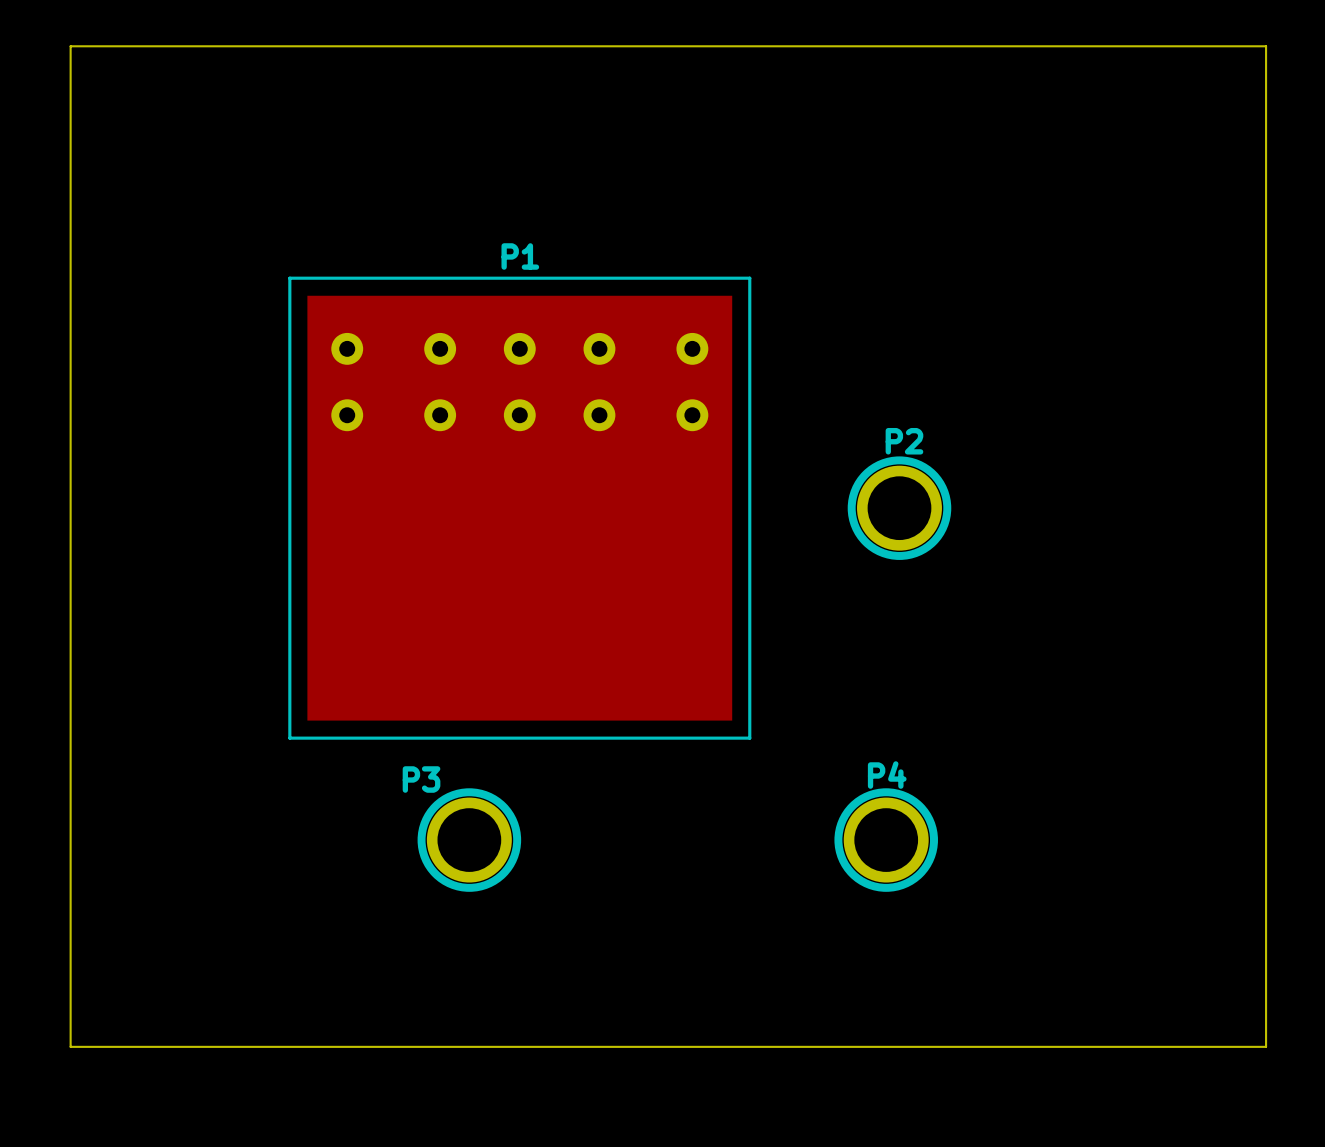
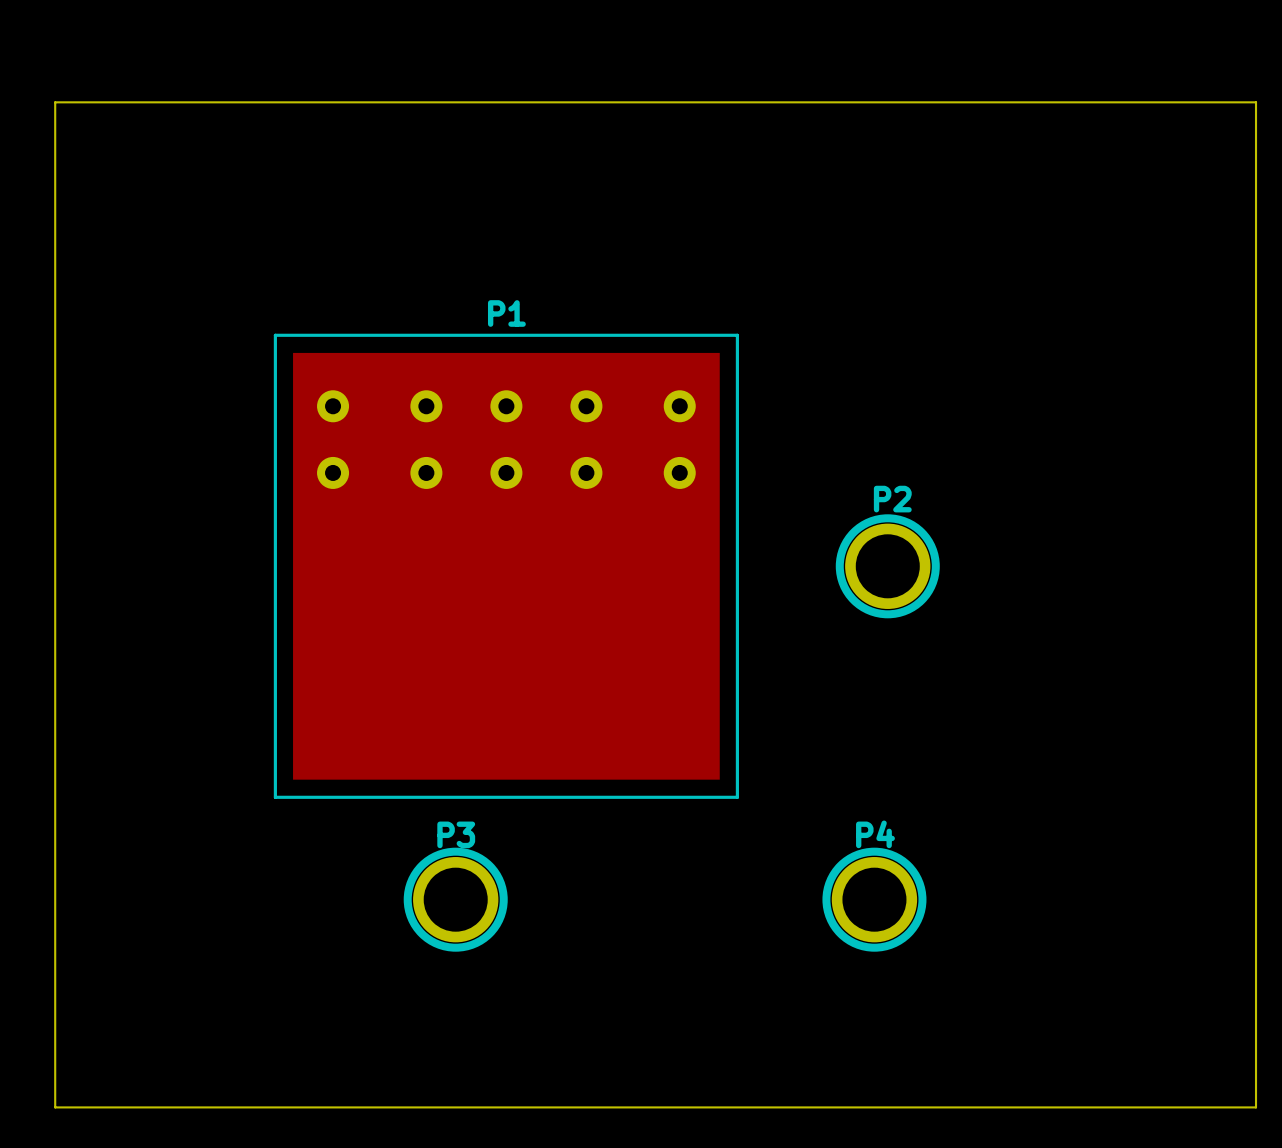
P3 name position: P3 (421, 779) -> P3 (456, 834)

